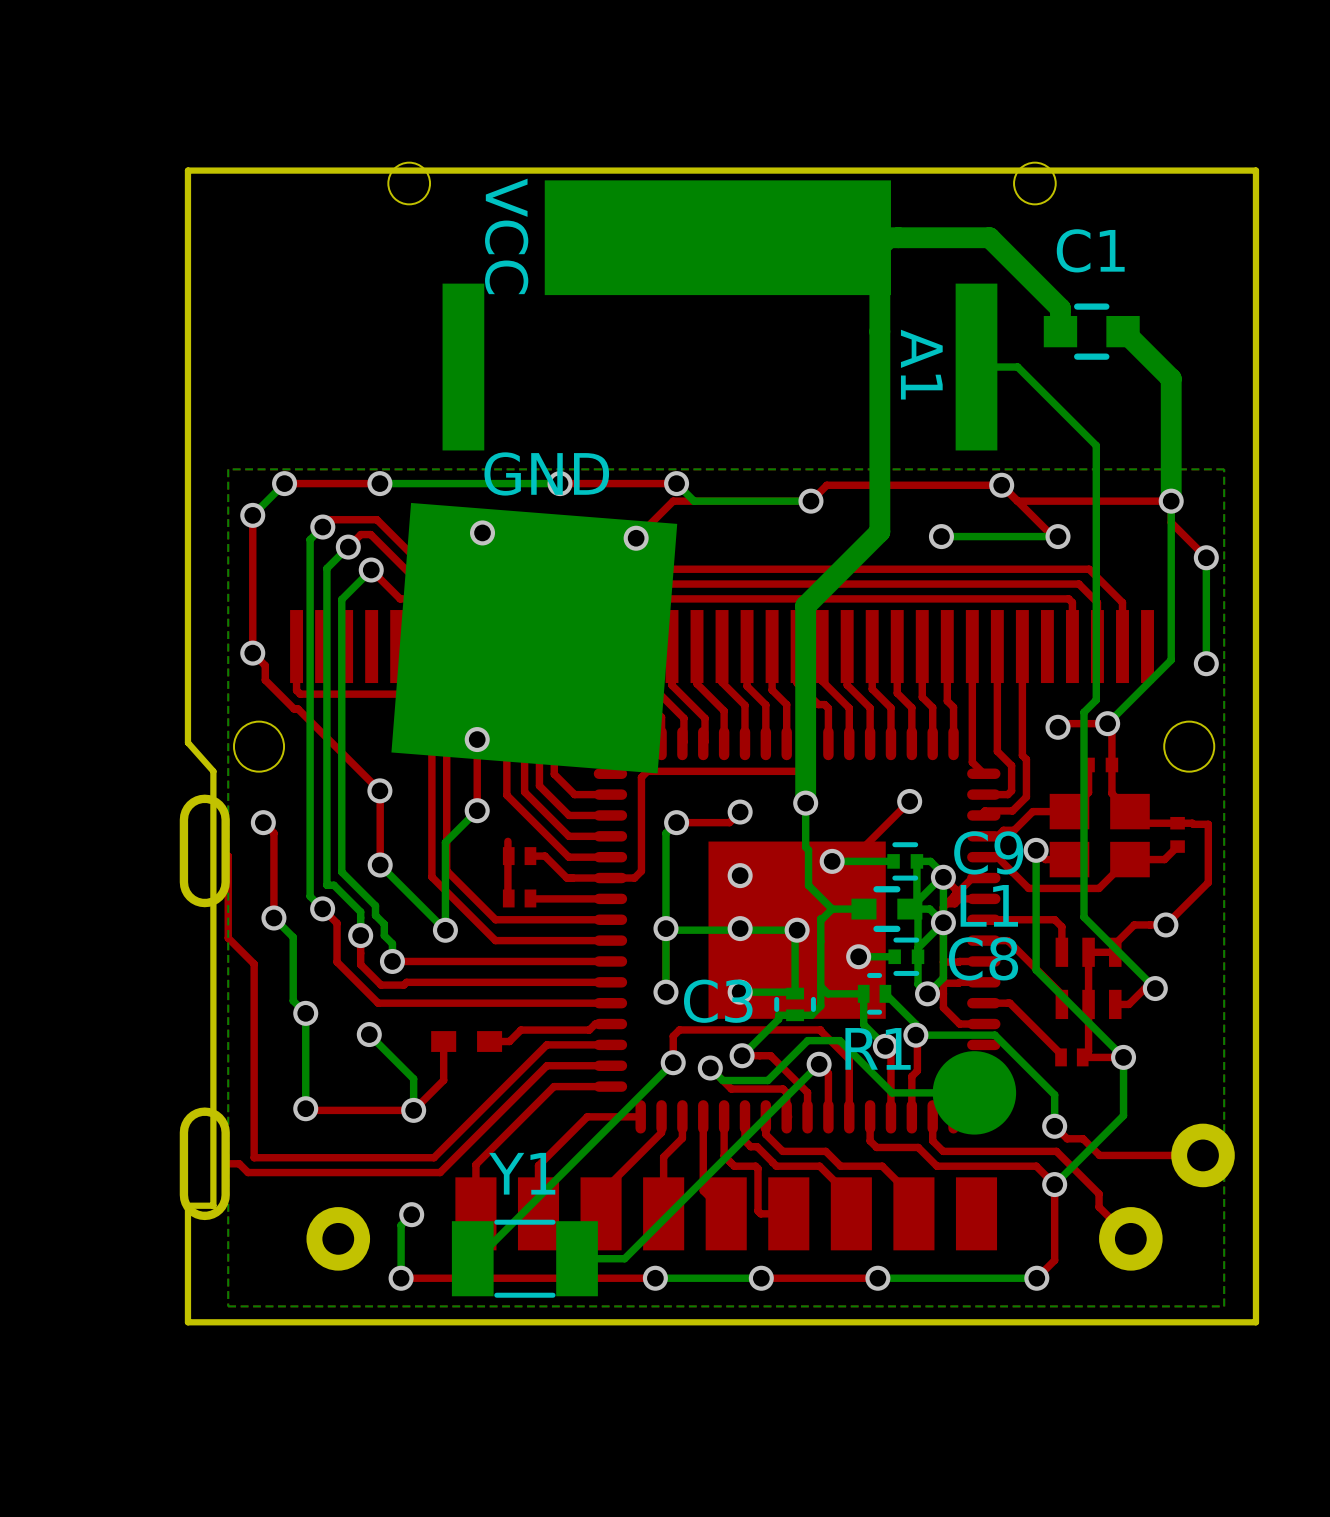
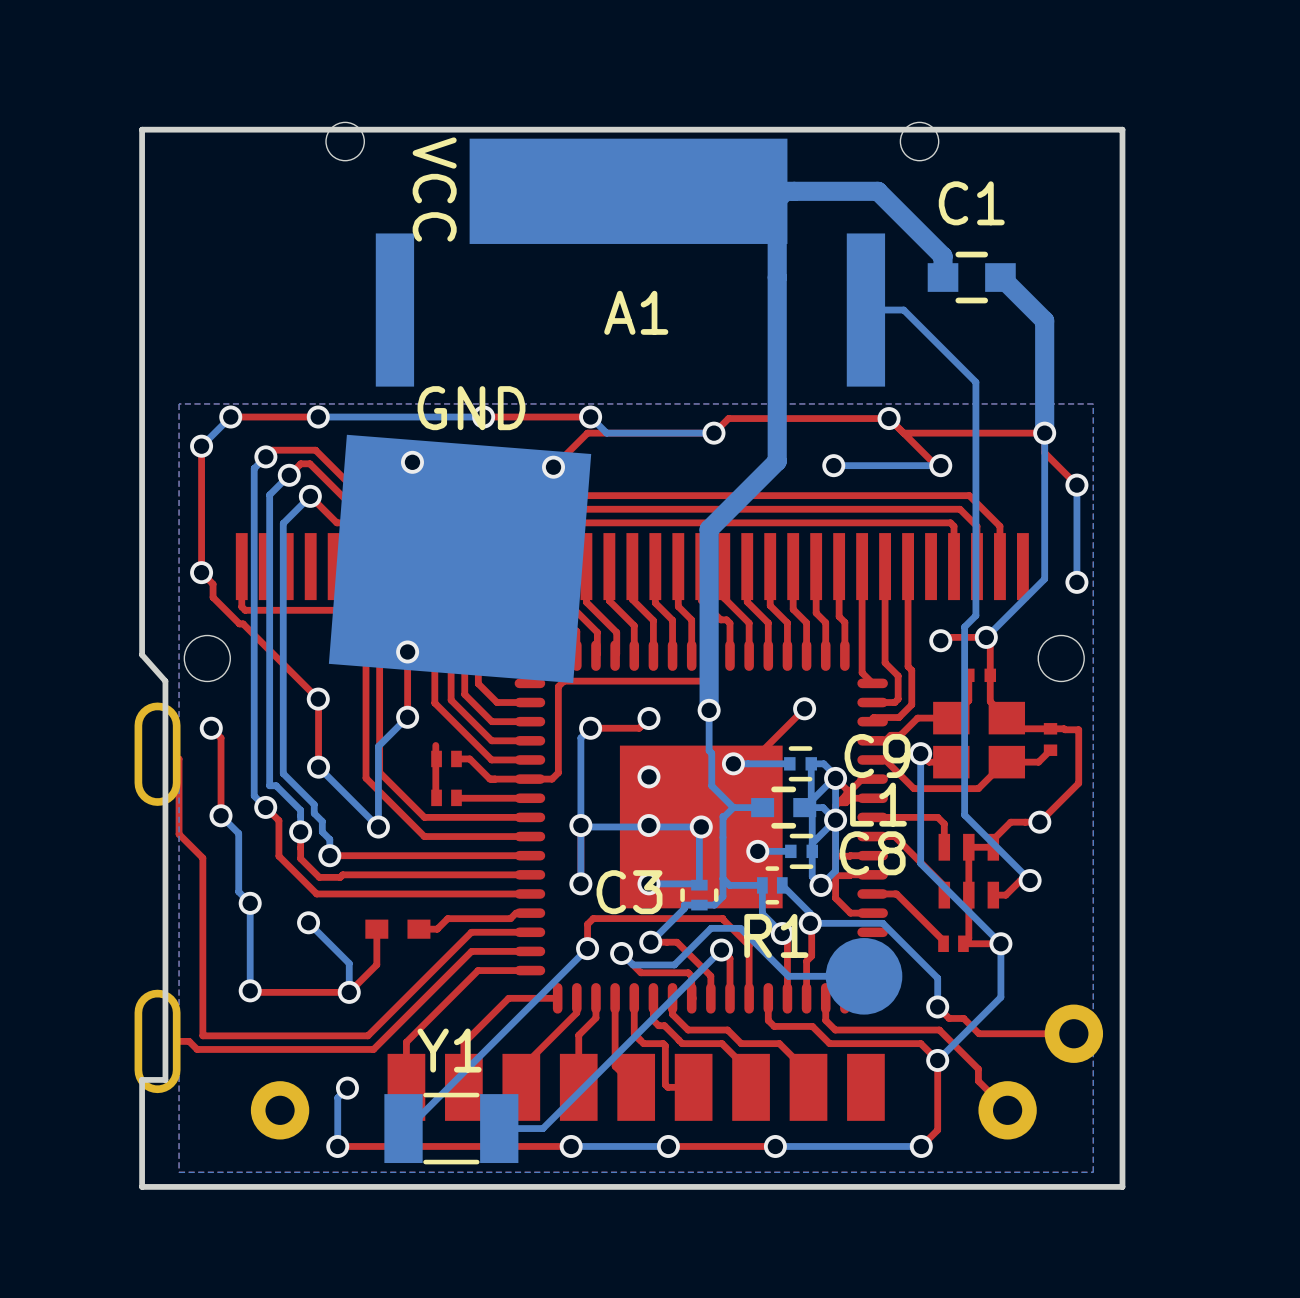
A1 name rotation: 0° (921, 364) -> 90° counterclockwise (636, 312)
A1 name position: A1 (921, 364) -> A1 (636, 312)

